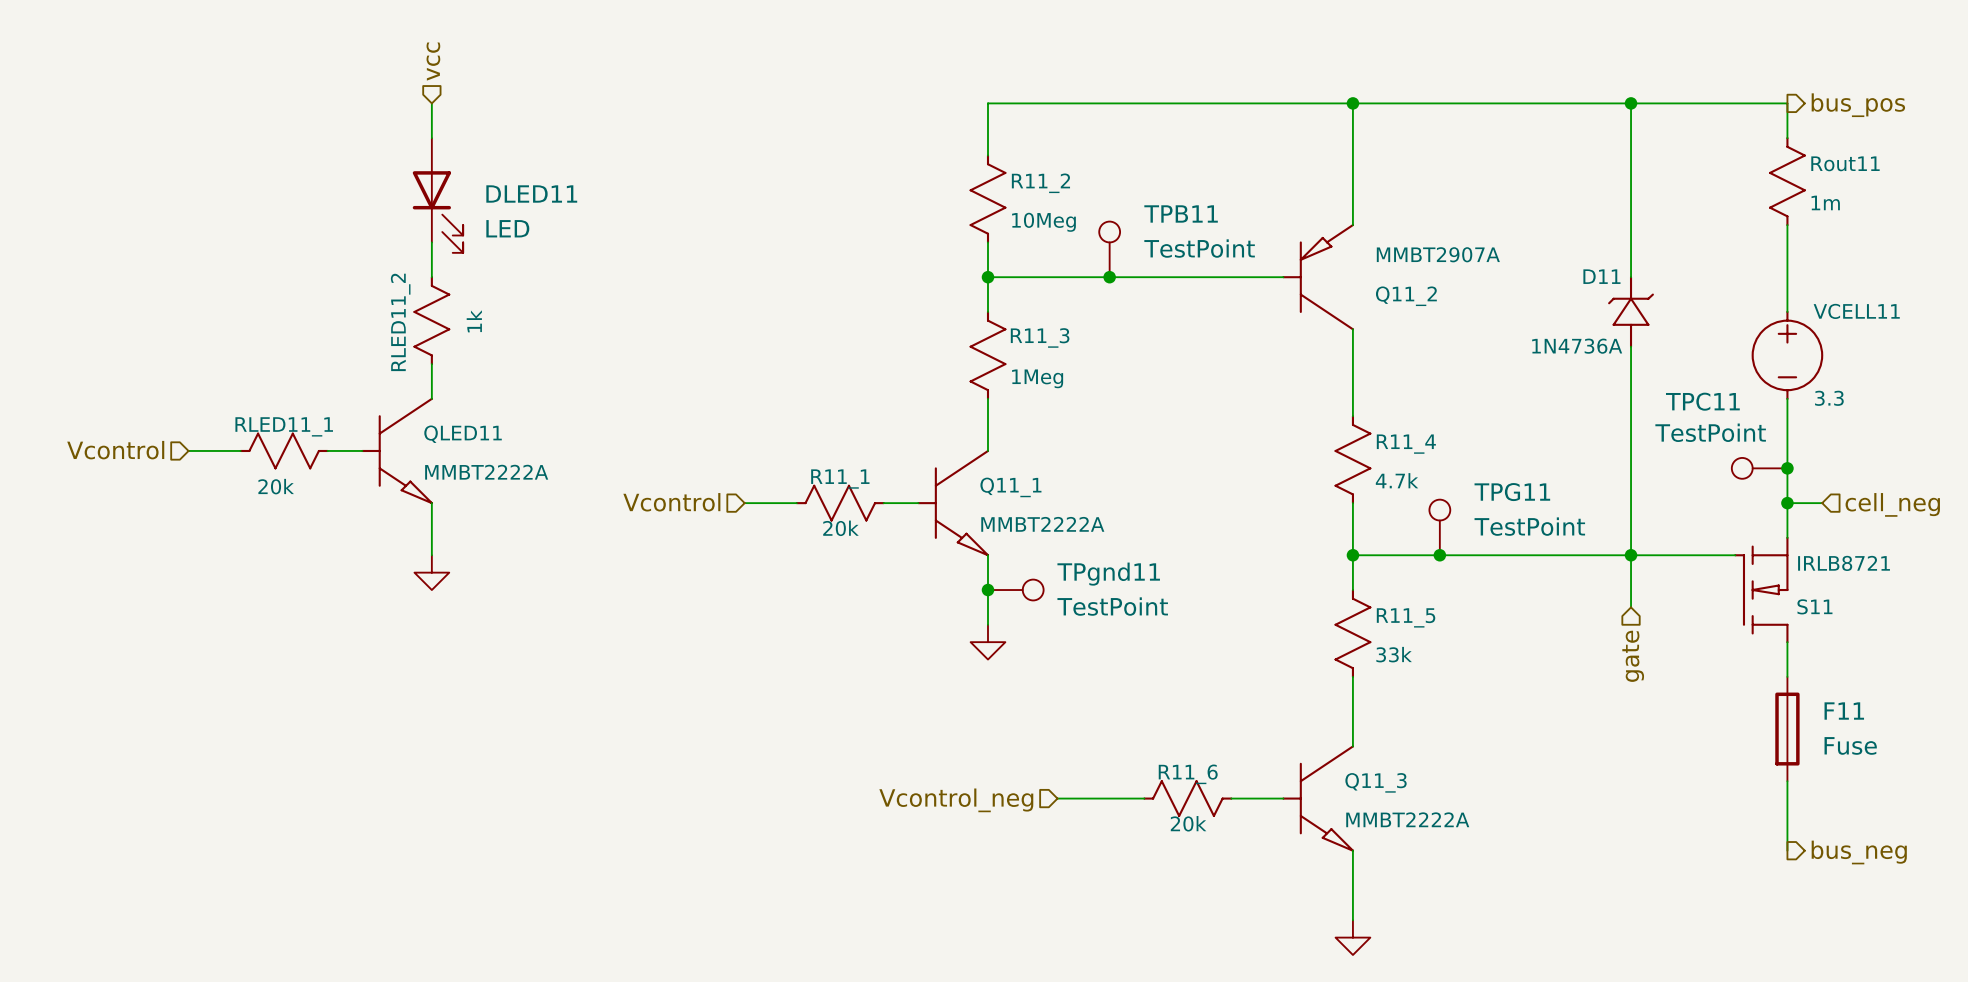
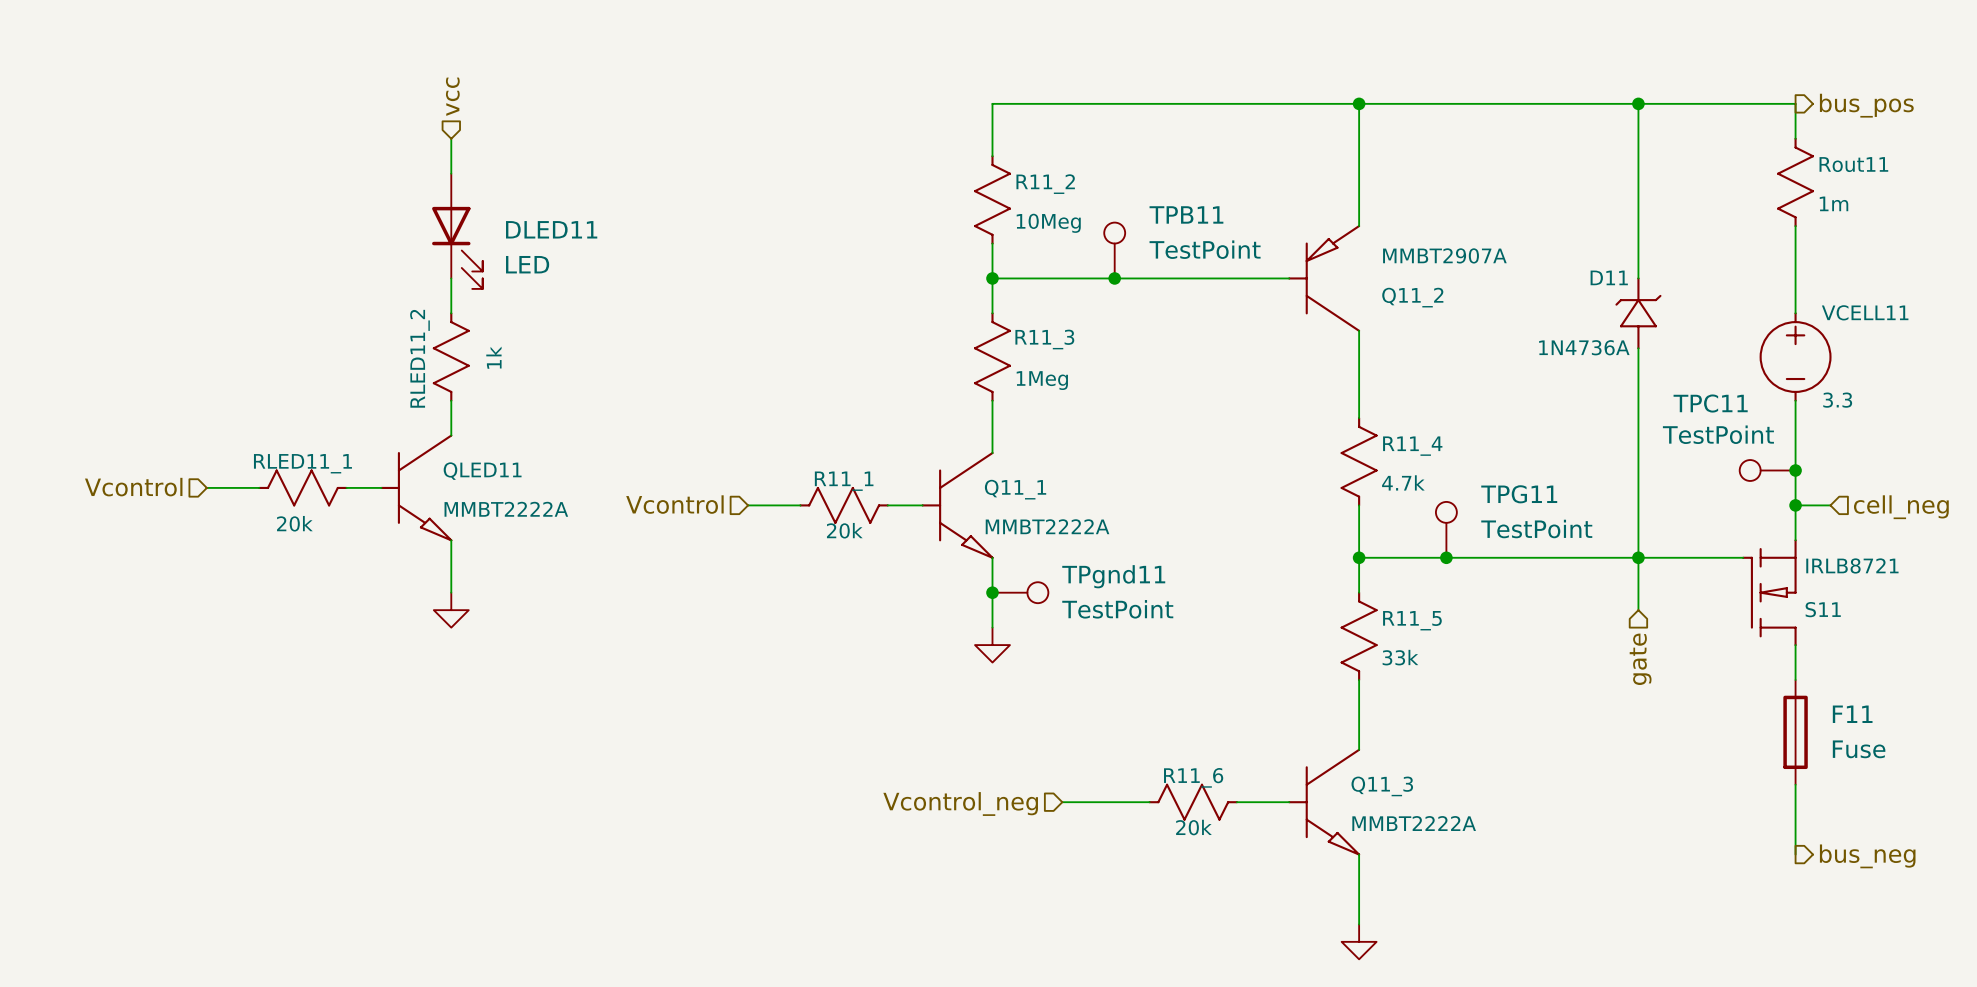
hierarchical label position: vcc (433, 61) -> vcc (452, 96)
wire: (431, 103) (431, 138) -> (451, 138) (451, 173)
DLED11 position: (437, 195) -> (457, 231)
wire: (431, 242) (431, 277) -> (451, 278) (451, 313)
RLED11_2 position: (431, 320) -> (451, 357)
wire: (431, 364) (431, 398) -> (451, 400) (451, 435)
hierarchical label position: Vcontrol (115, 450) -> Vcontrol (133, 487)
wire: (188, 450) (240, 450) -> (206, 487) (259, 487)
RLED11_1 position: (284, 450) -> (302, 487)
wire: (327, 450) (362, 450) -> (346, 487) (381, 487)
QLED11 position: (397, 450) -> (416, 487)
wire: (431, 503) (431, 555) -> (451, 540) (451, 592)
power symbol position: (431, 572) -> (451, 610)

